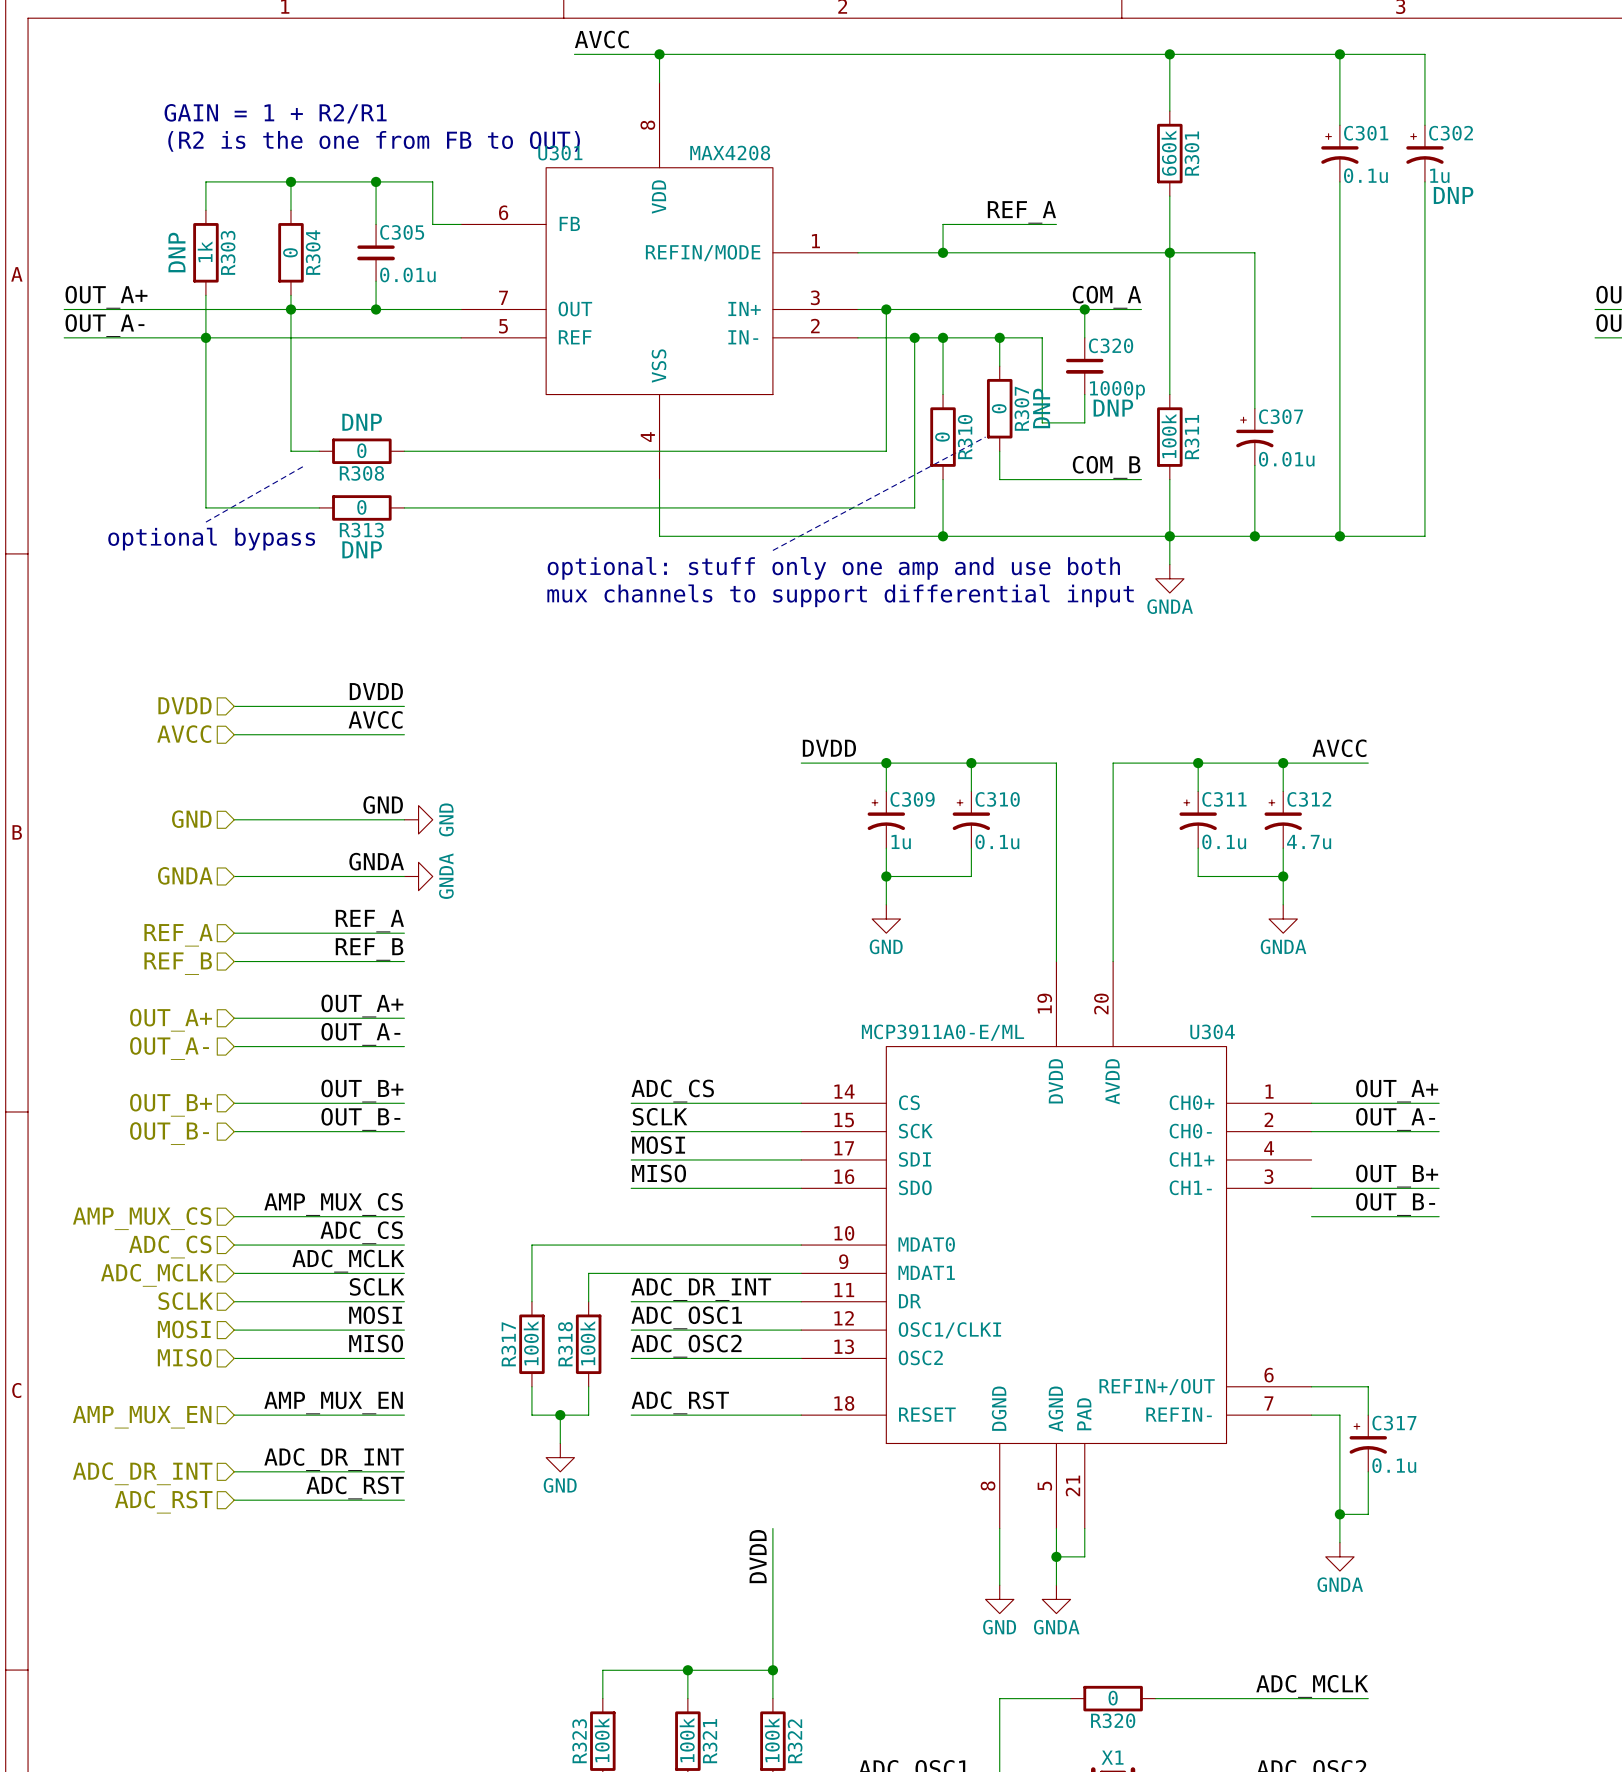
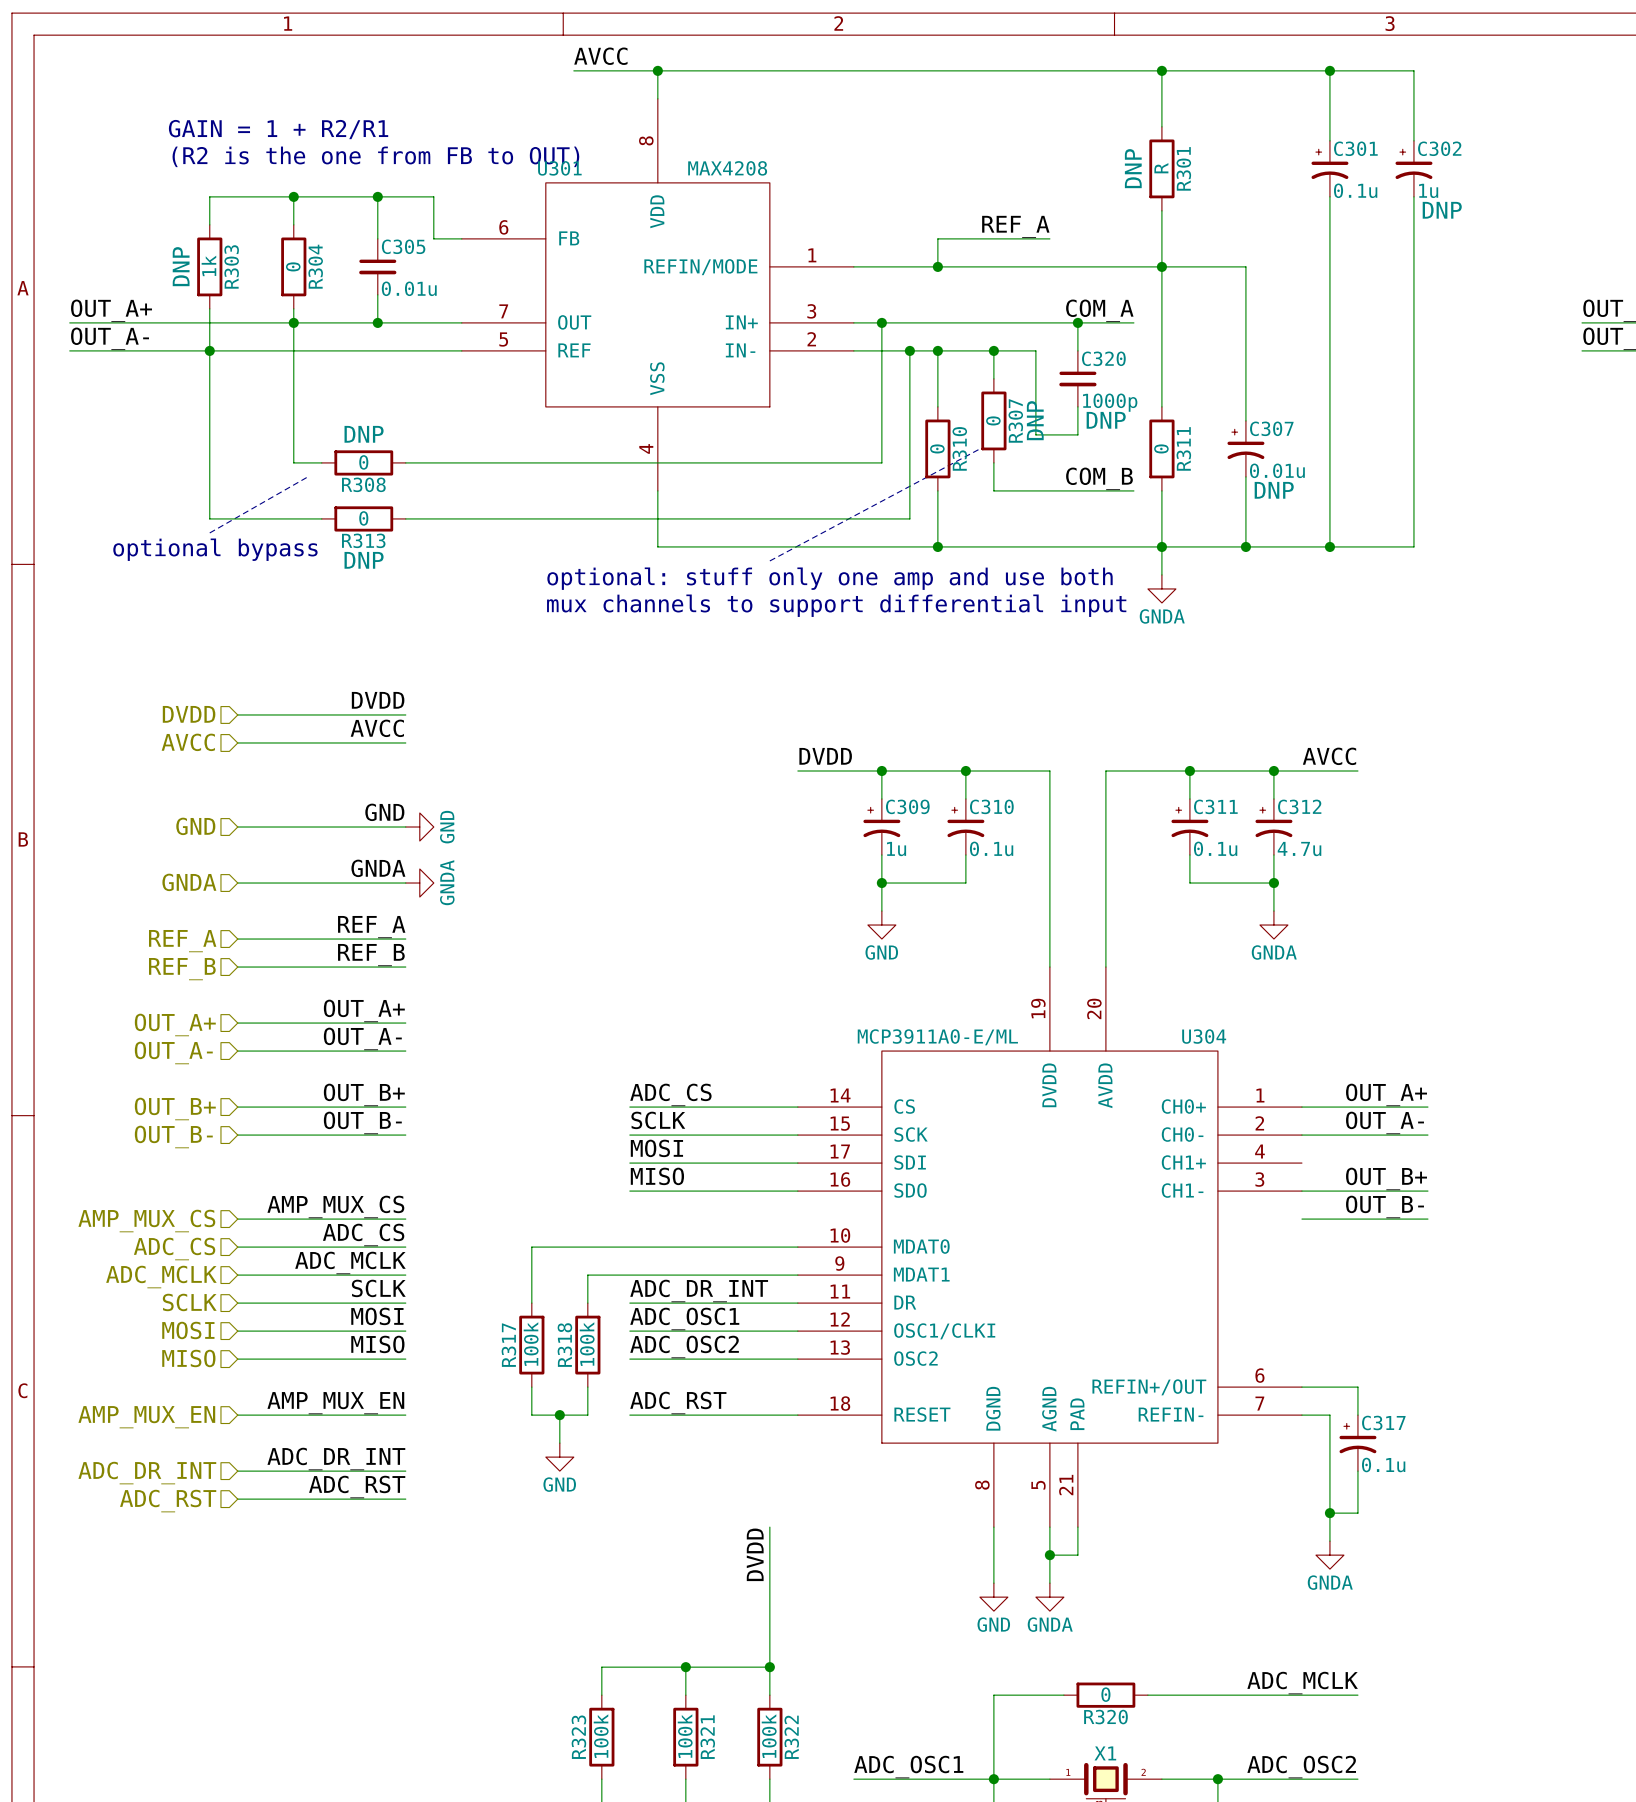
R301 text: none -> DNP (1133, 168)
R301 value: 660k (1169, 153) -> R (1161, 168)
R311 value: 100k (1169, 436) -> 0 (1161, 448)
C307 text: none -> DNP (1274, 490)

